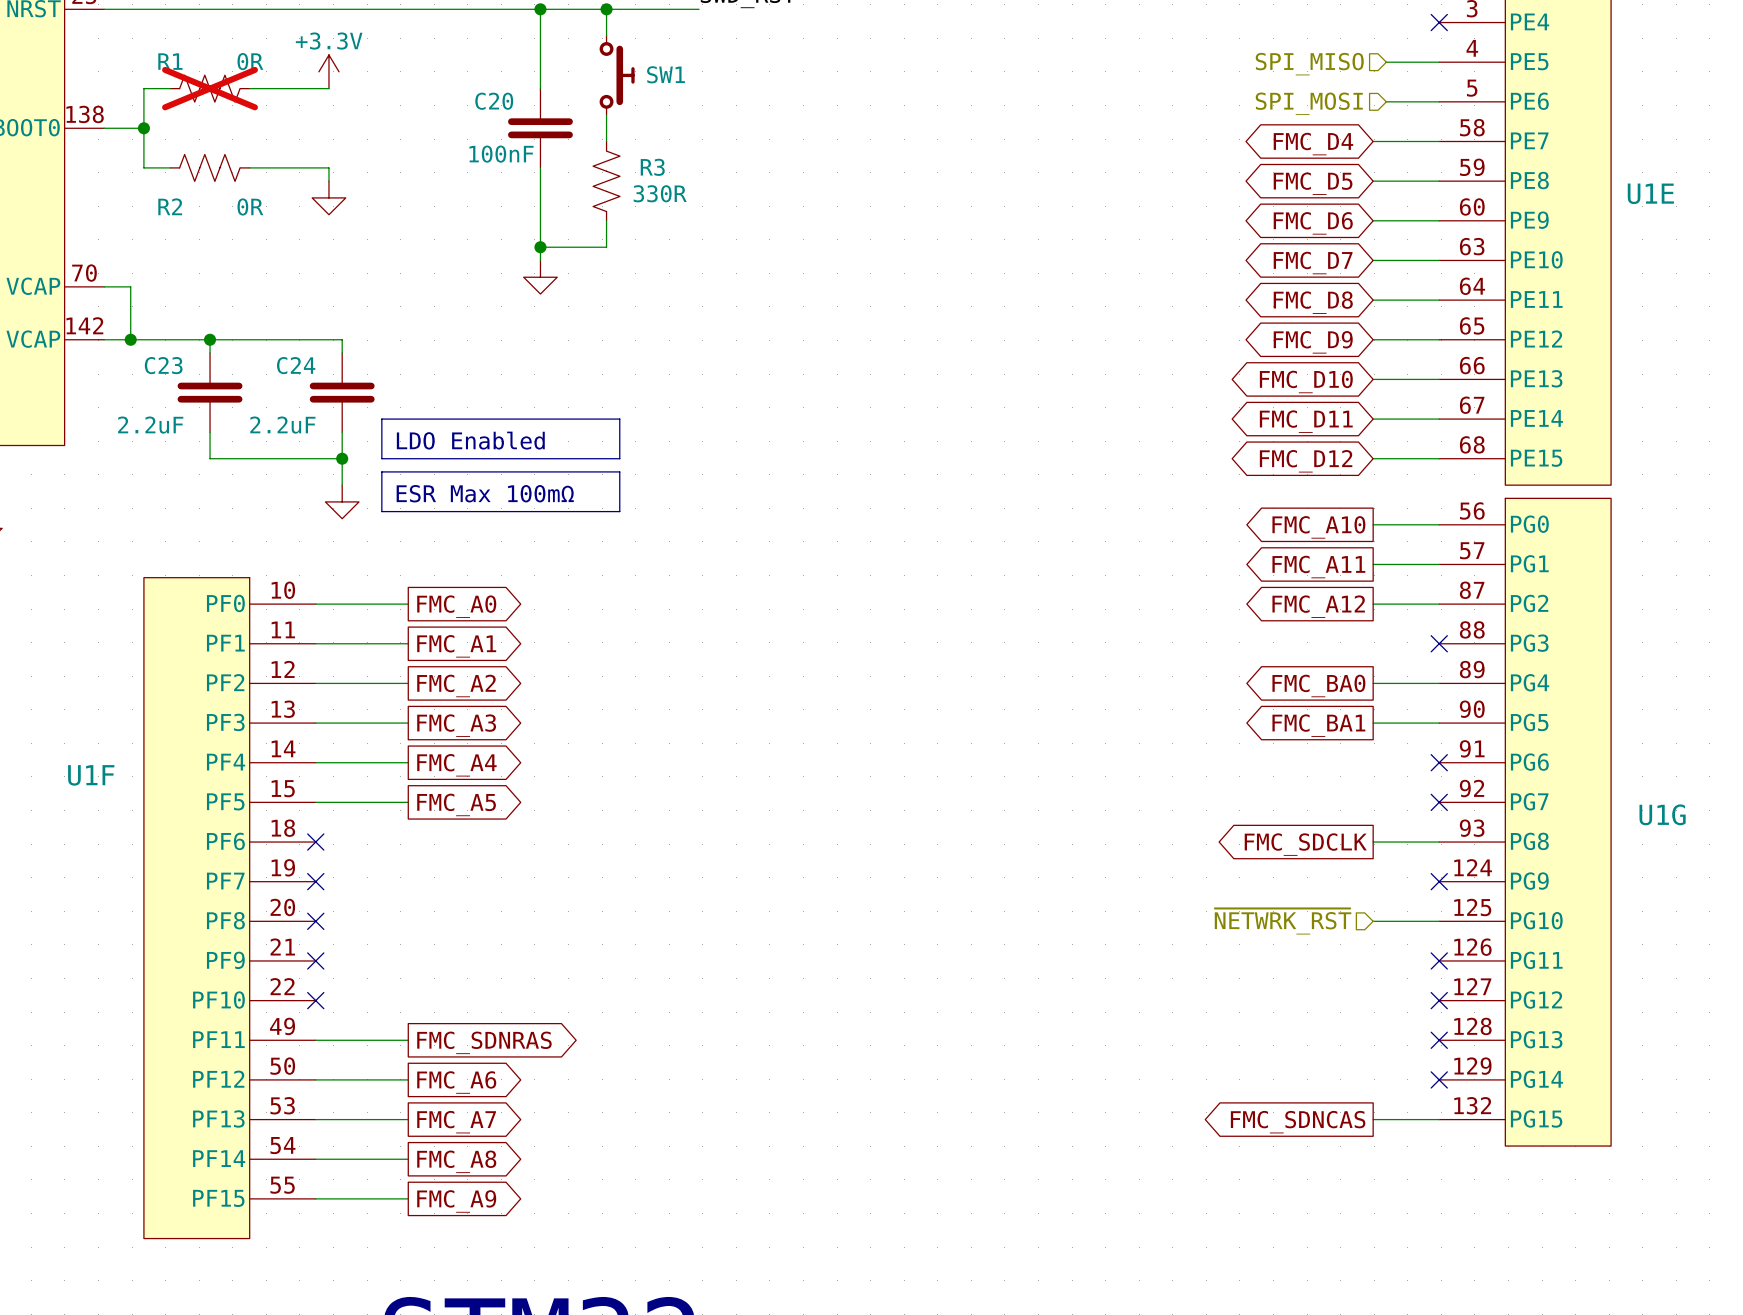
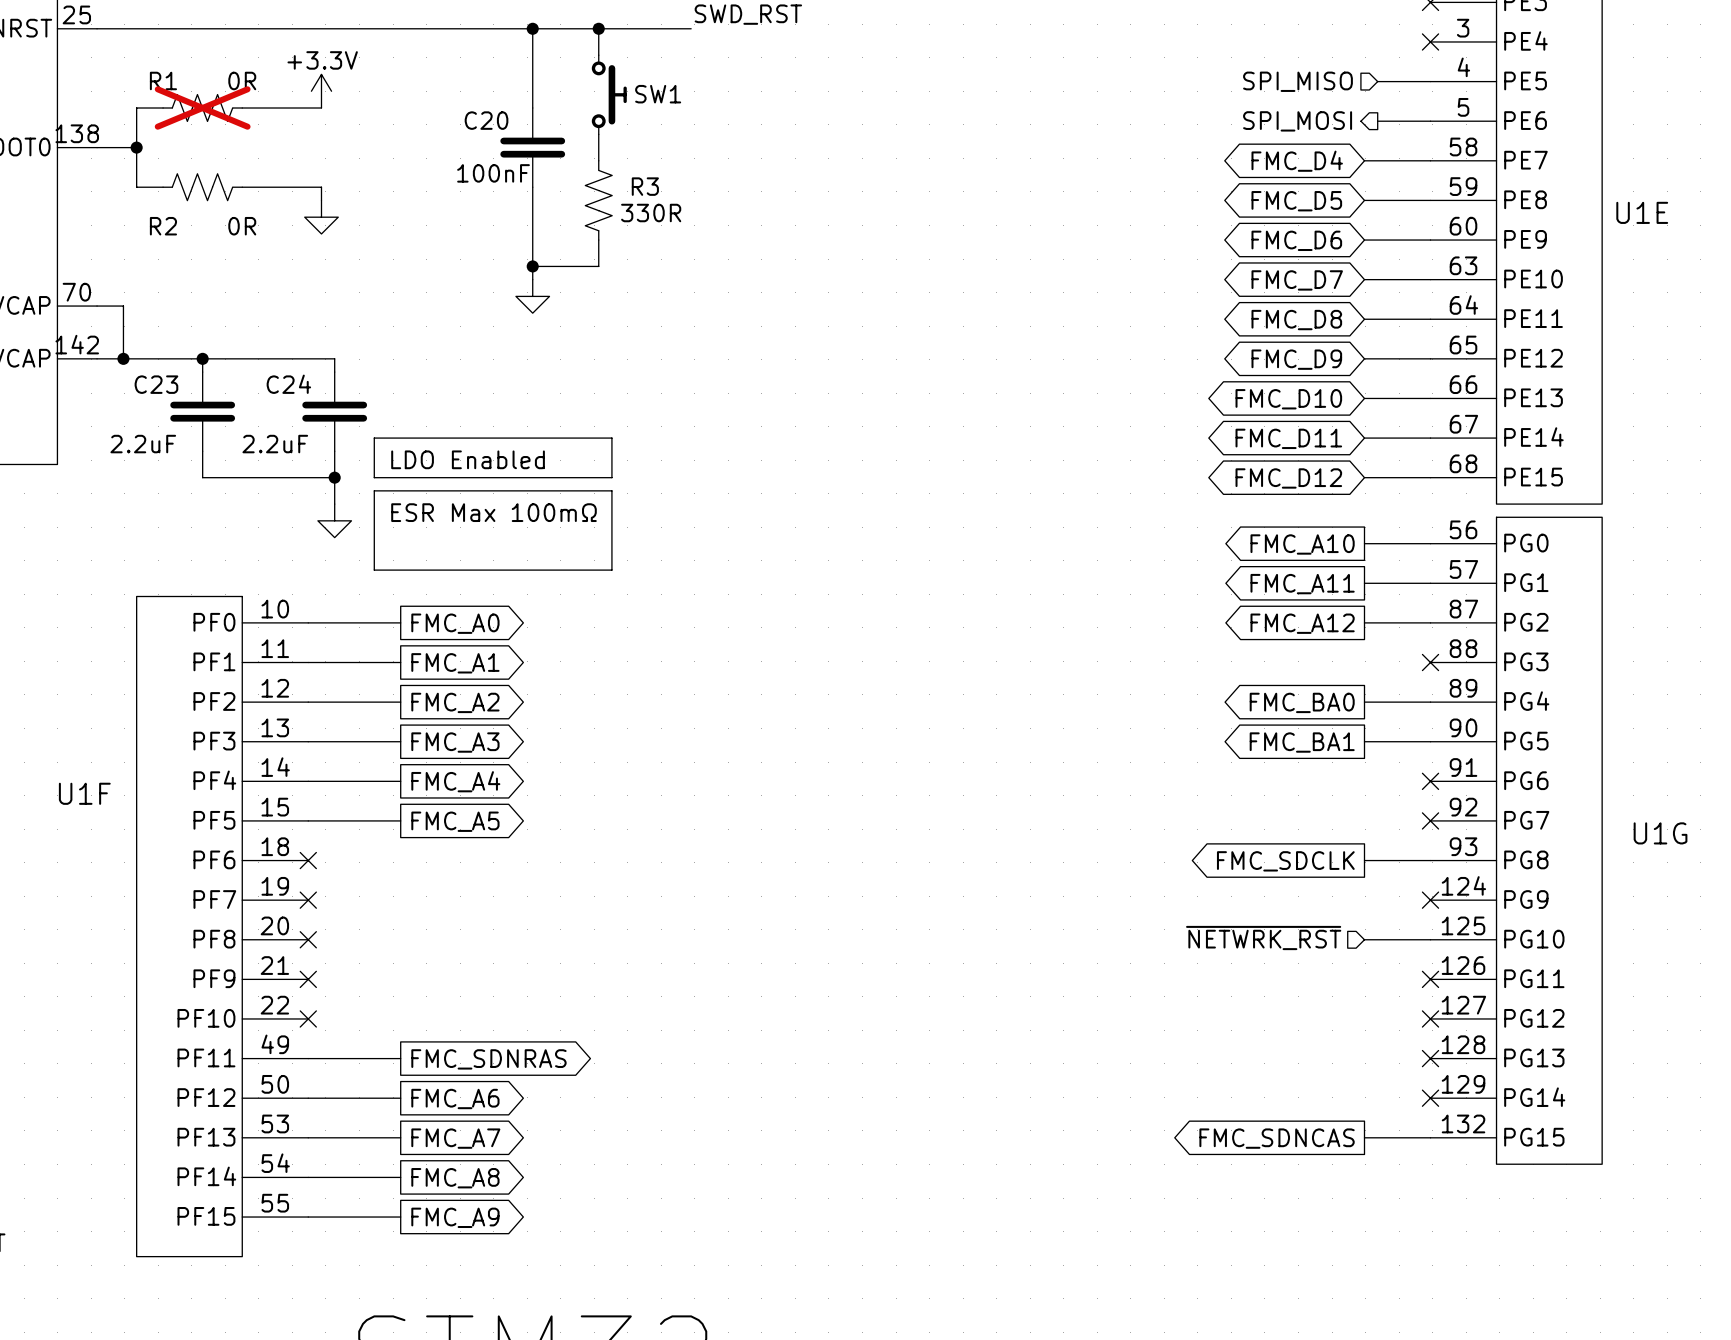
hierarchical label shape: input (1309, 103) -> output (1297, 121)
line: (381, 511) (619, 511) -> (374, 530) (374, 570) (611, 570) (611, 530)

